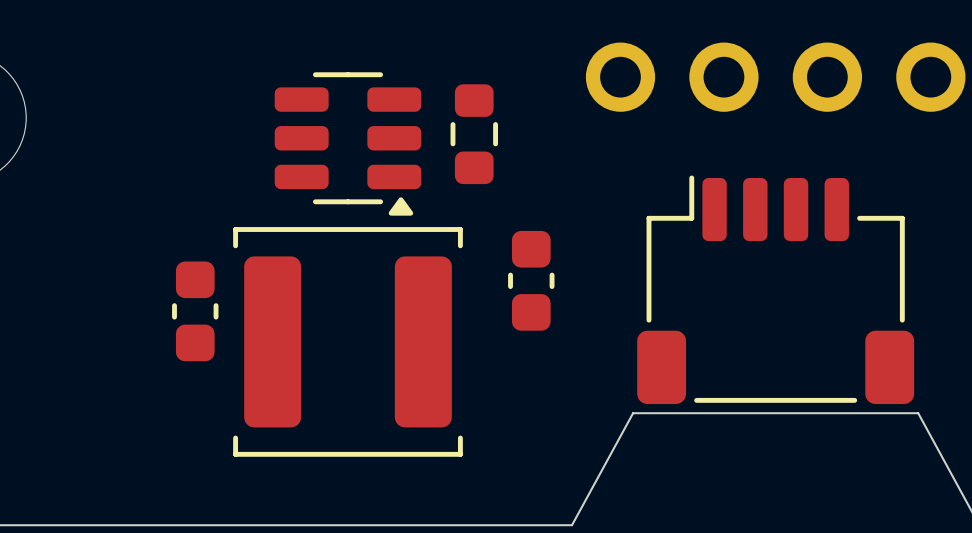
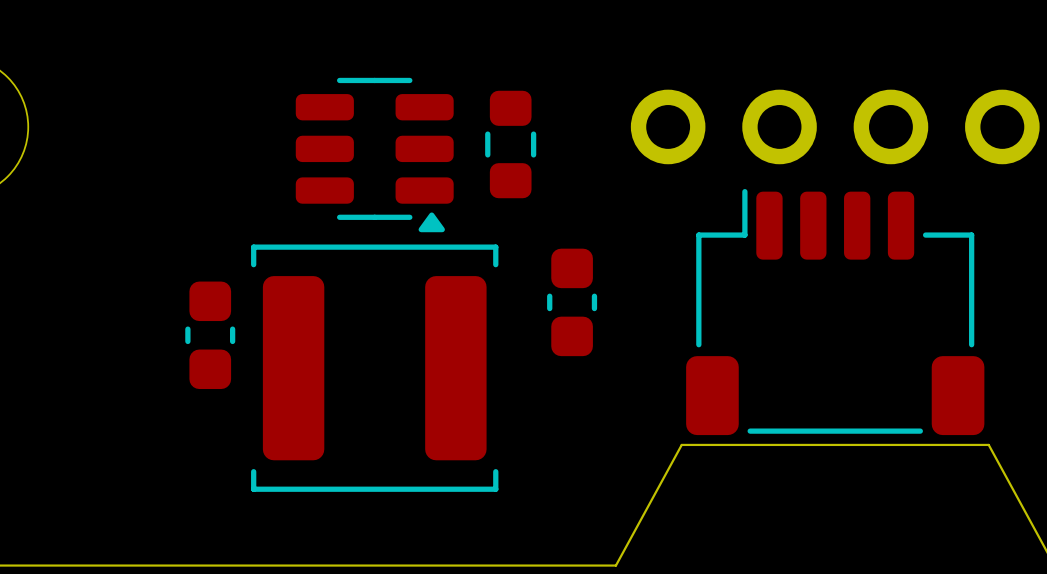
part position: (775, 77) -> (835, 126)

